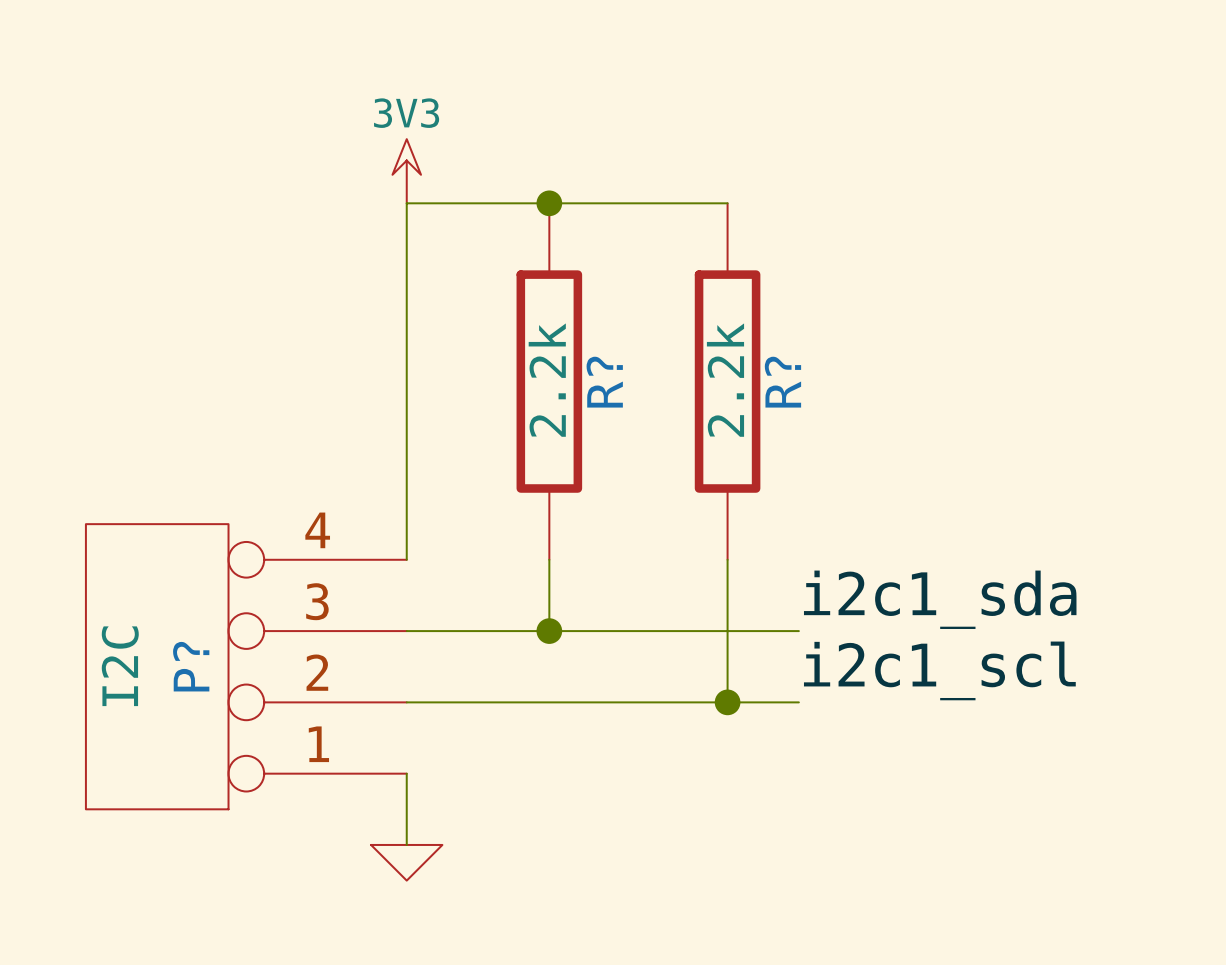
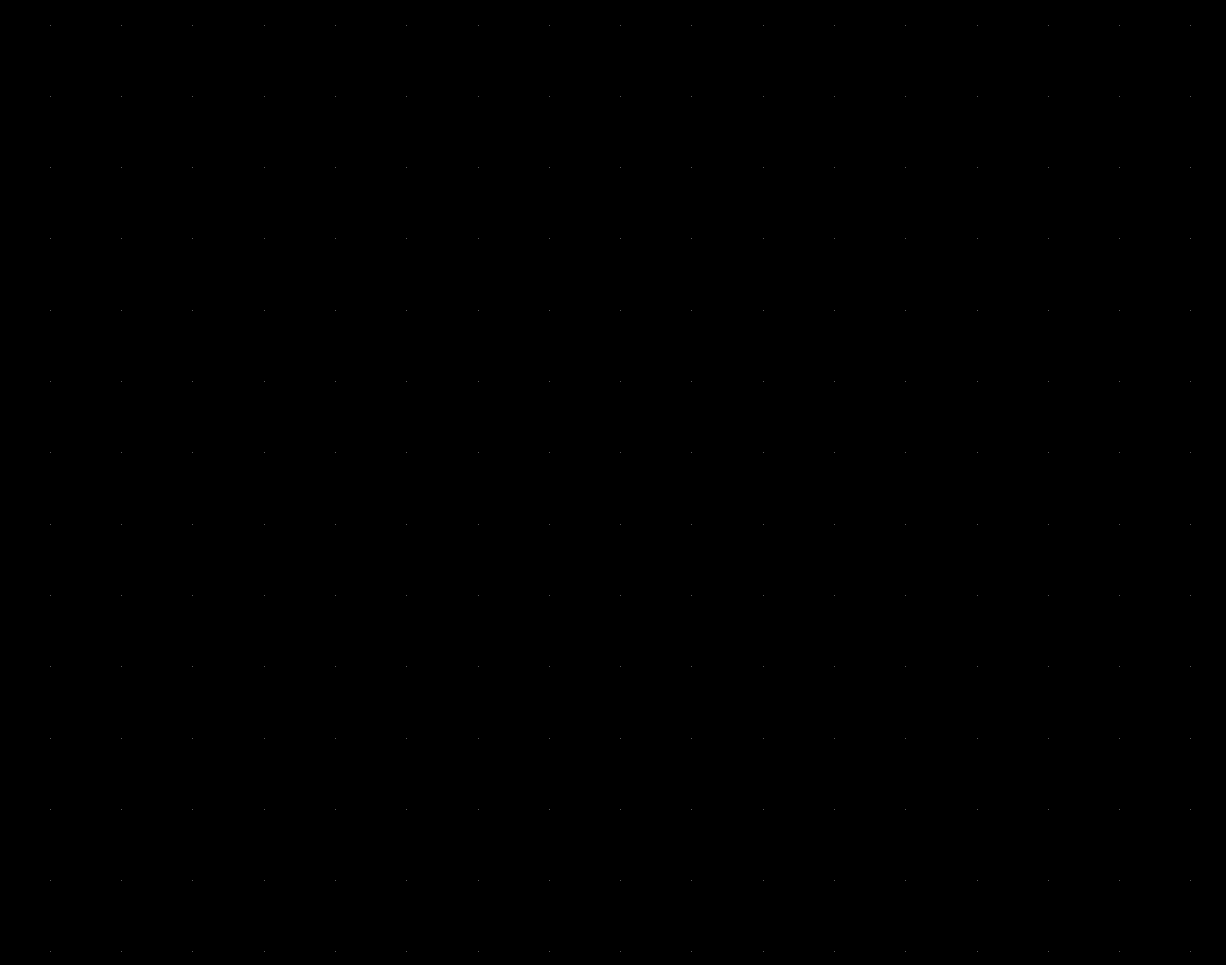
power symbol: 3V3 (406, 171) -> none
junction: (549, 203) -> none
wire: (727, 203) (406, 203) (406, 559) -> none
R?: 2.2k (549, 381) -> none
R?: 2.2k (727, 381) -> none
wire: (549, 559) (549, 631) -> none
wire: (727, 559) (727, 702) -> none
label: i2c1_sda (940, 599) -> none
wire: (406, 631) (798, 631) -> none
junction: (549, 631) -> none
P?: I2C (246, 666) -> none
label: i2c1_scl (939, 670) -> none
wire: (406, 702) (798, 702) -> none
junction: (727, 702) -> none
wire: (406, 773) (406, 844) -> none
power symbol: (406, 862) -> none

